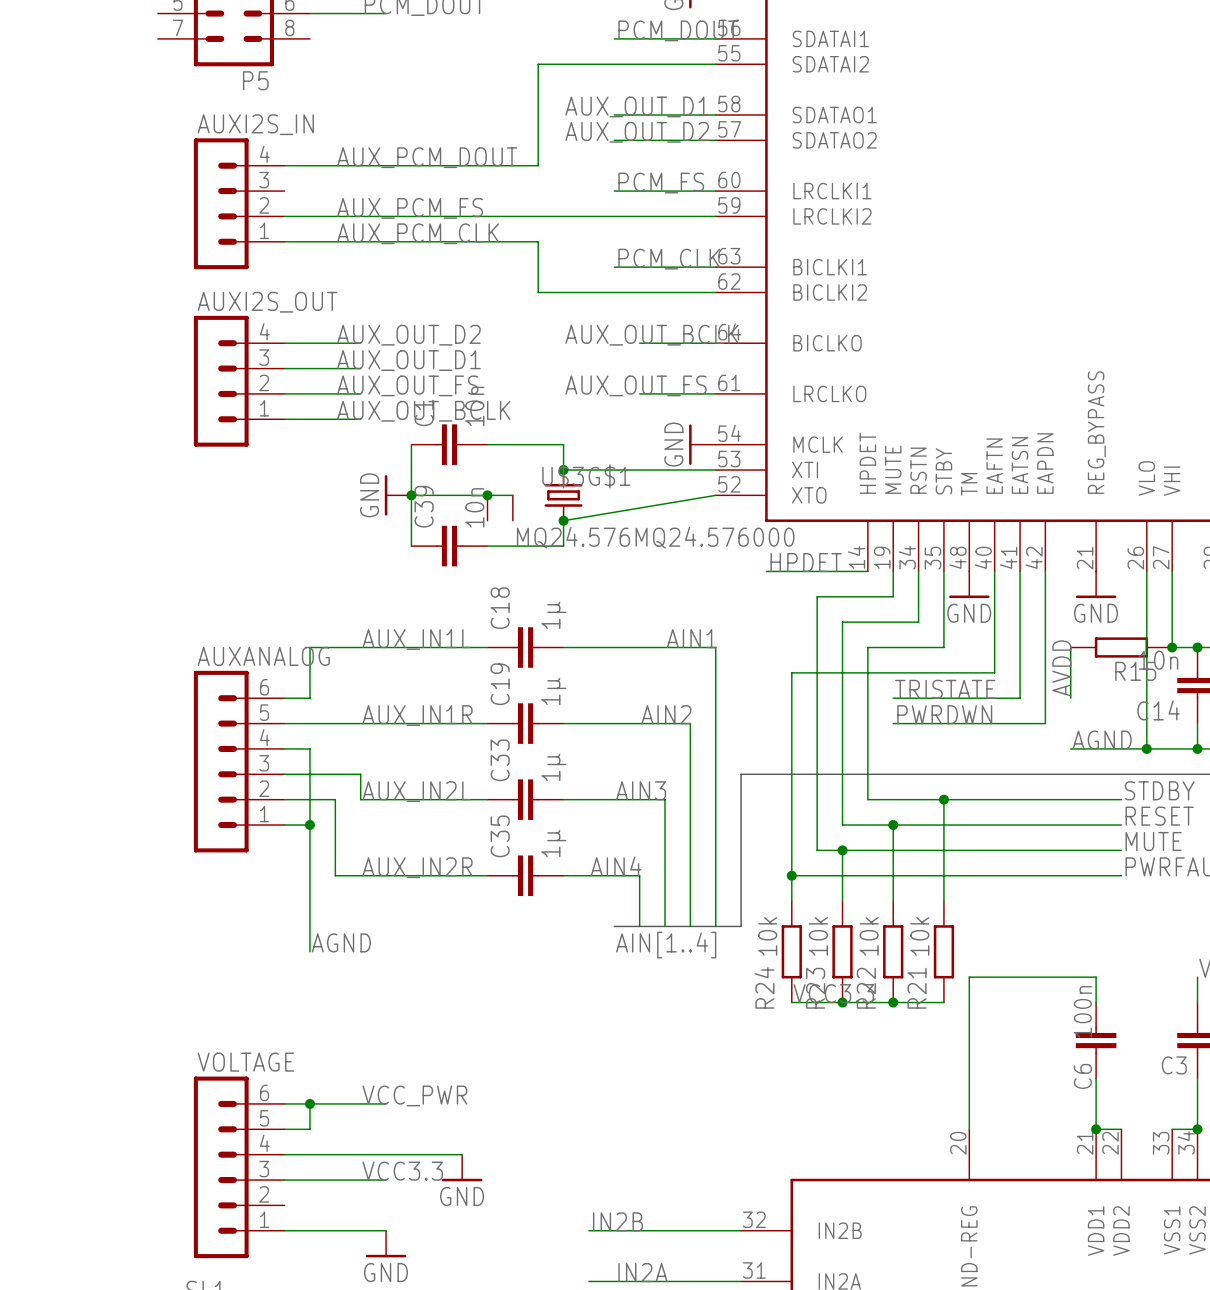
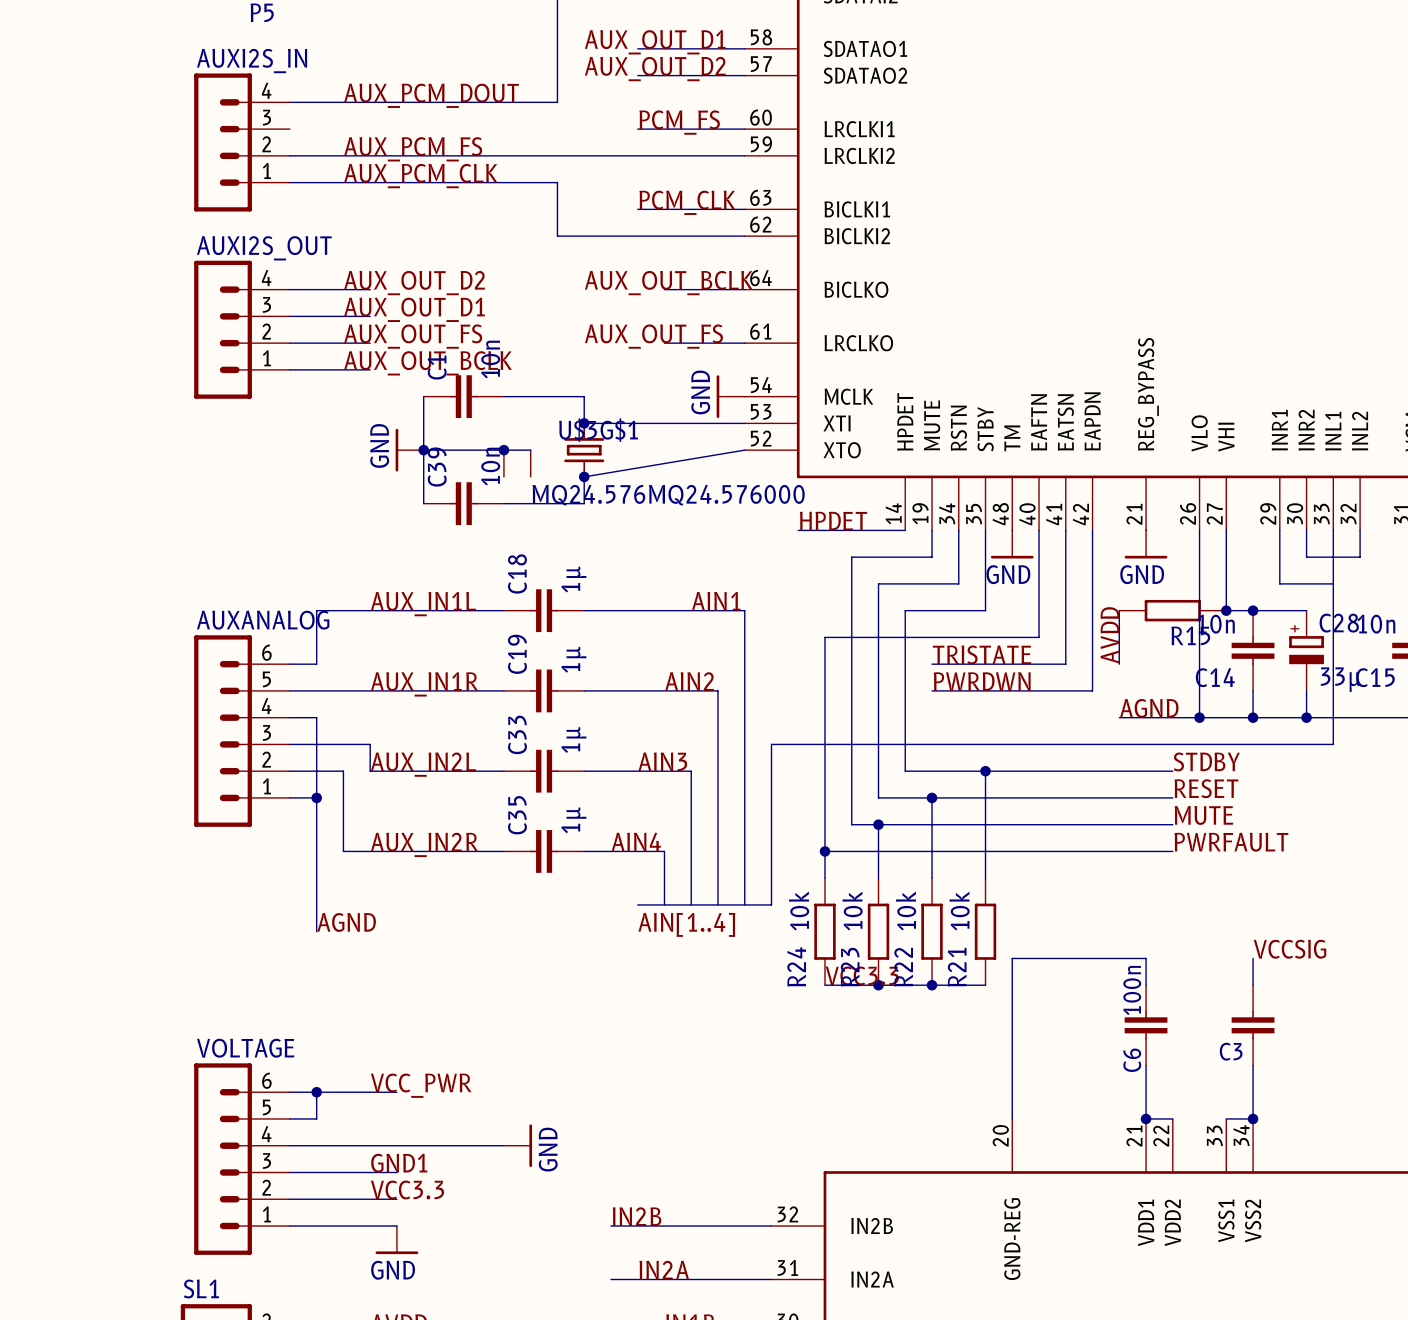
wire: none -> (477, 1145) (503, 1145)
power symbol position: GND (462, 1167) -> GND (518, 1145)
label: VCC3.3 (402, 1171) -> GND1 (399, 1163)
power symbol rotation: 0° (462, 1180) -> 90° counterclockwise (530, 1145)
label: none -> VCC3.3 (407, 1190)
wire: none -> (289, 1199) (396, 1199)

